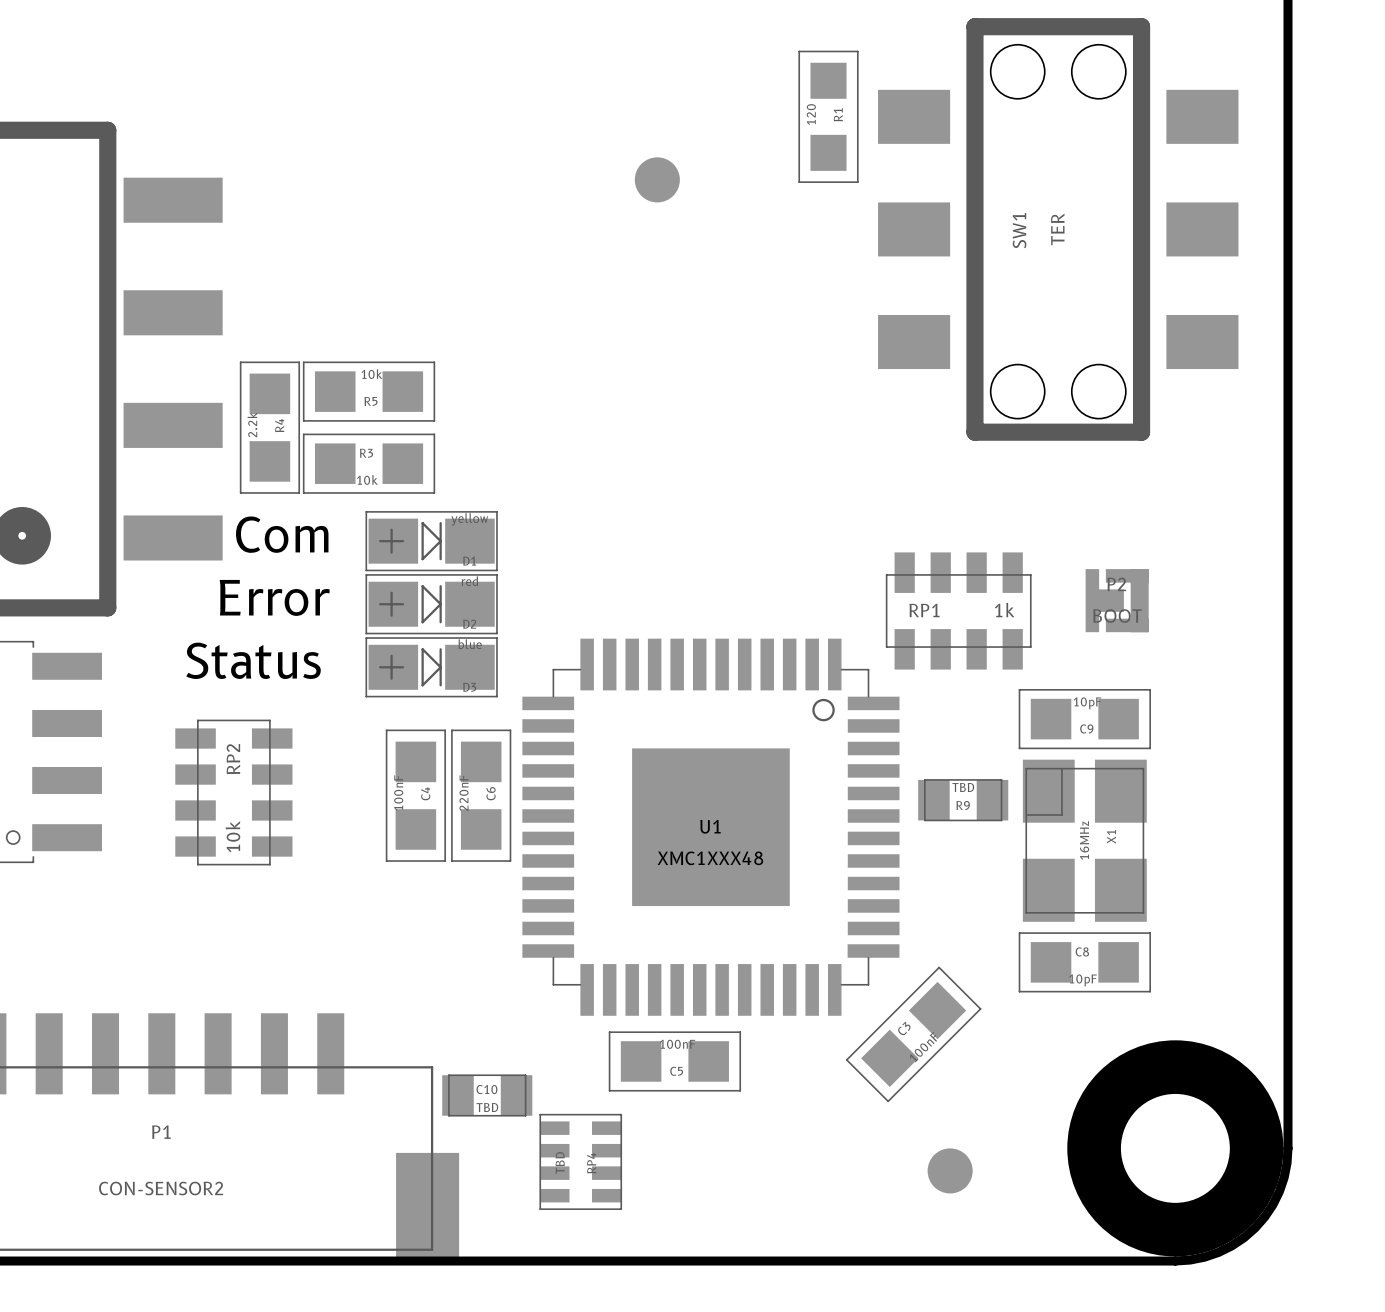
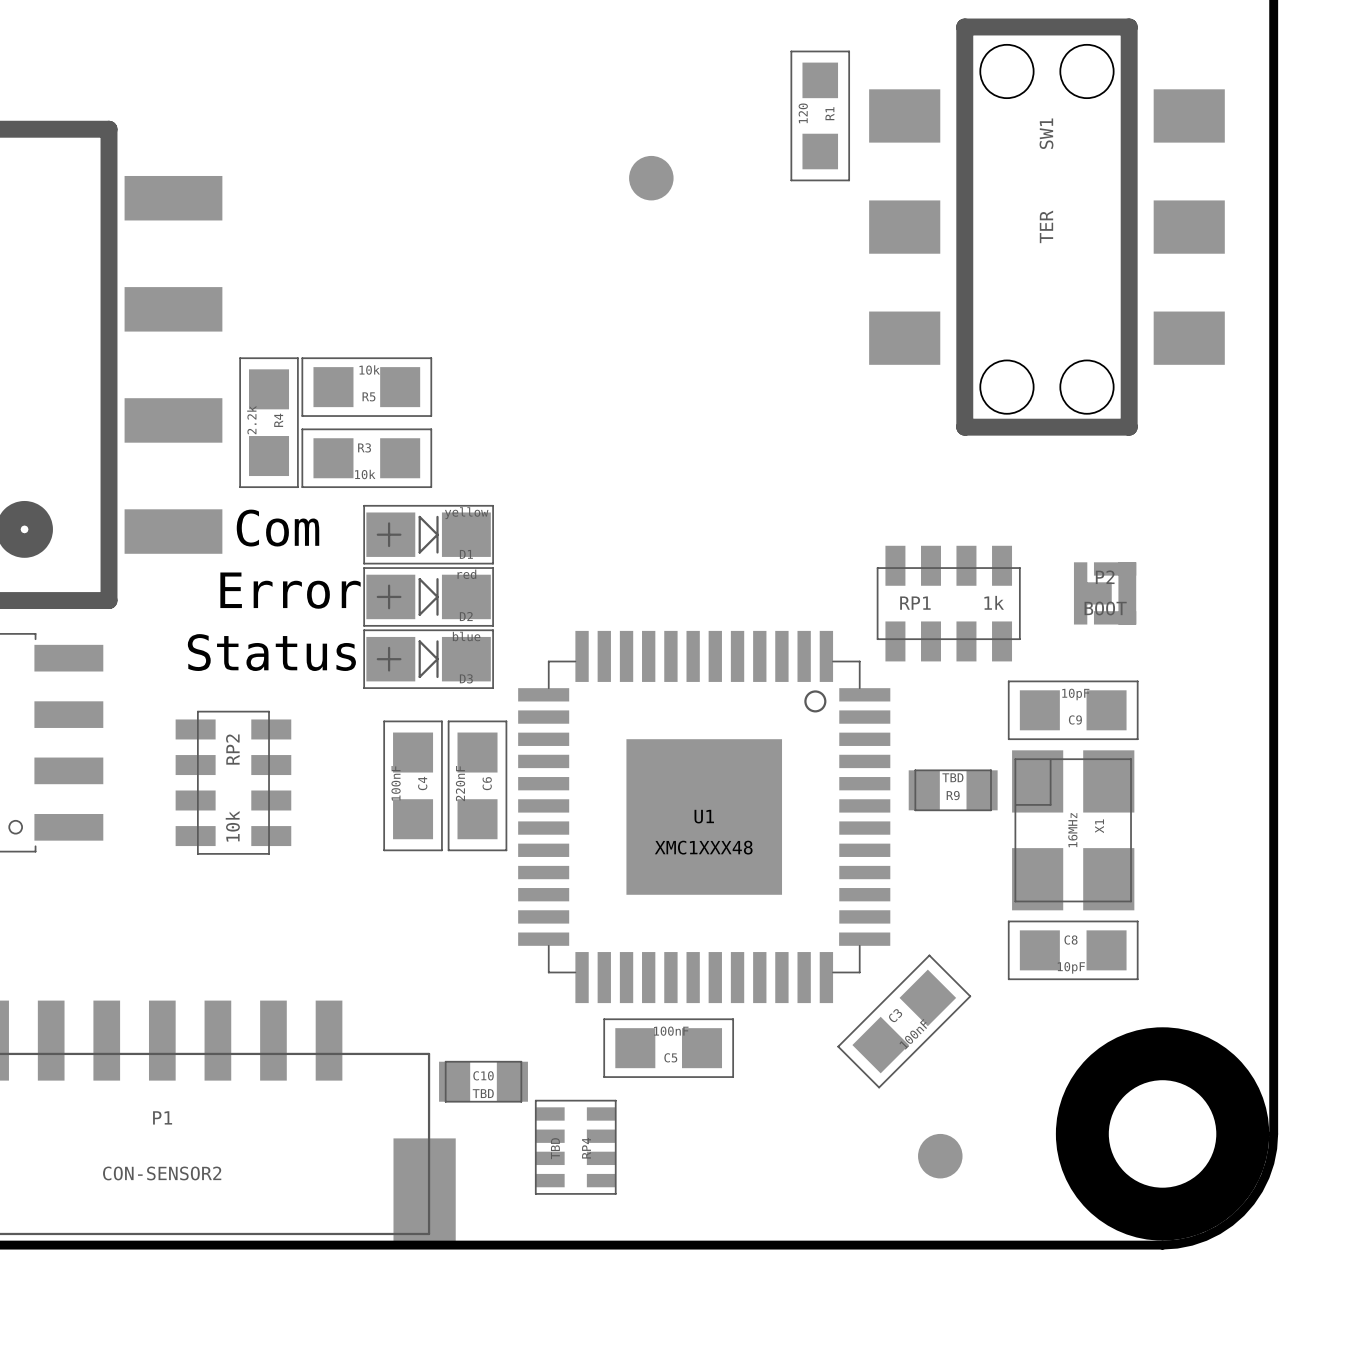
SW1 name position: SW1 (1019, 230) -> SW1 (1046, 133)

